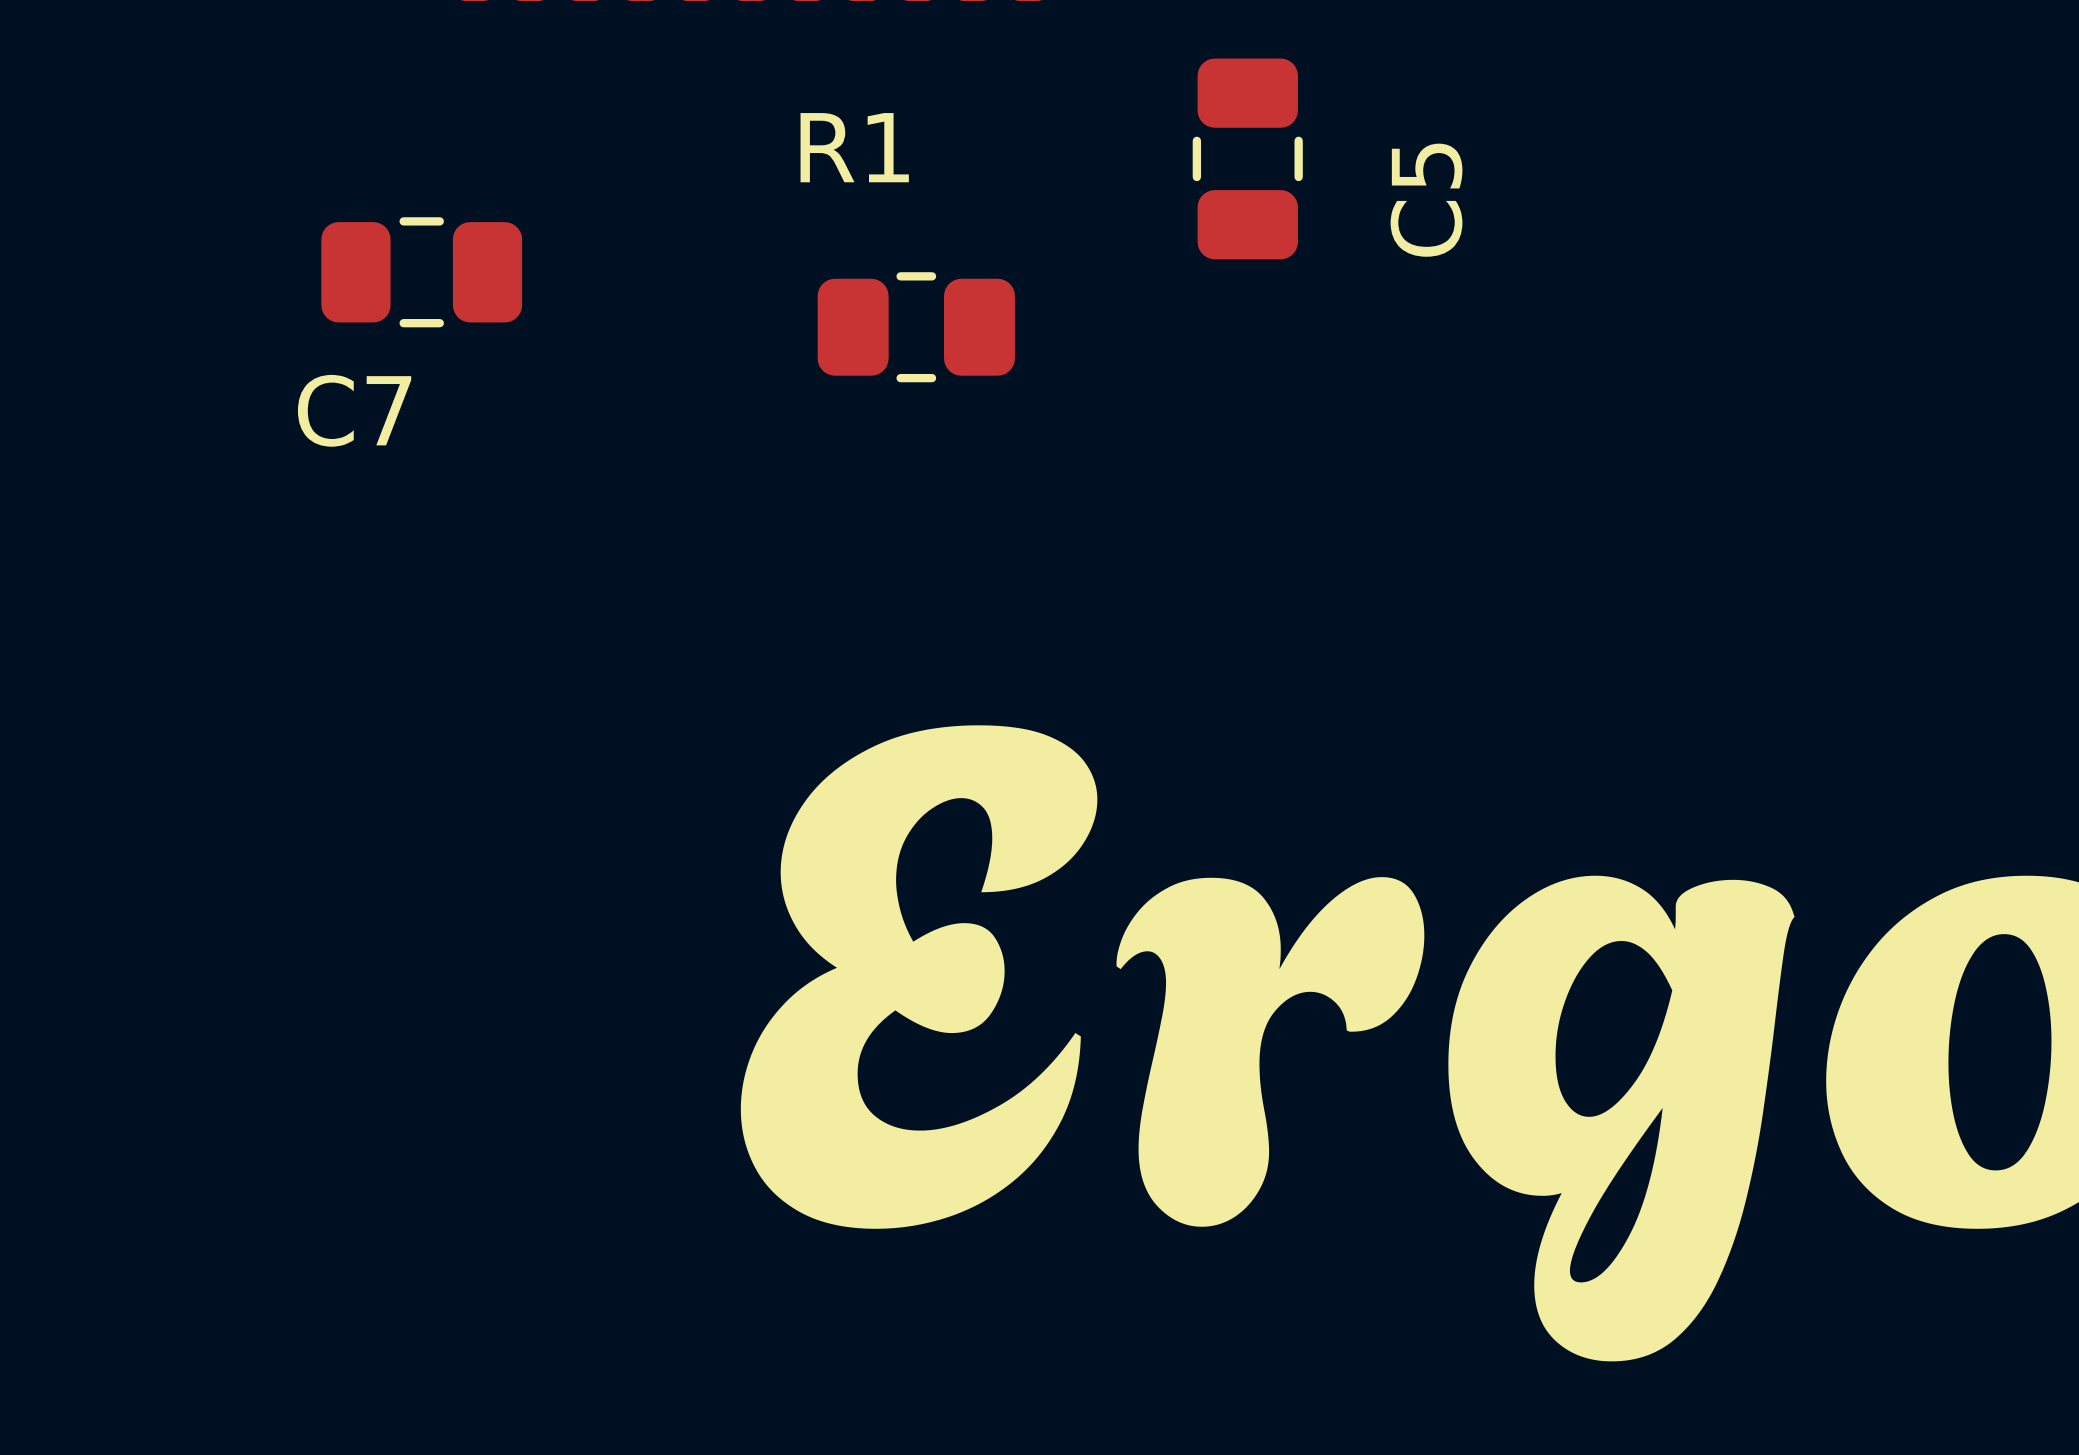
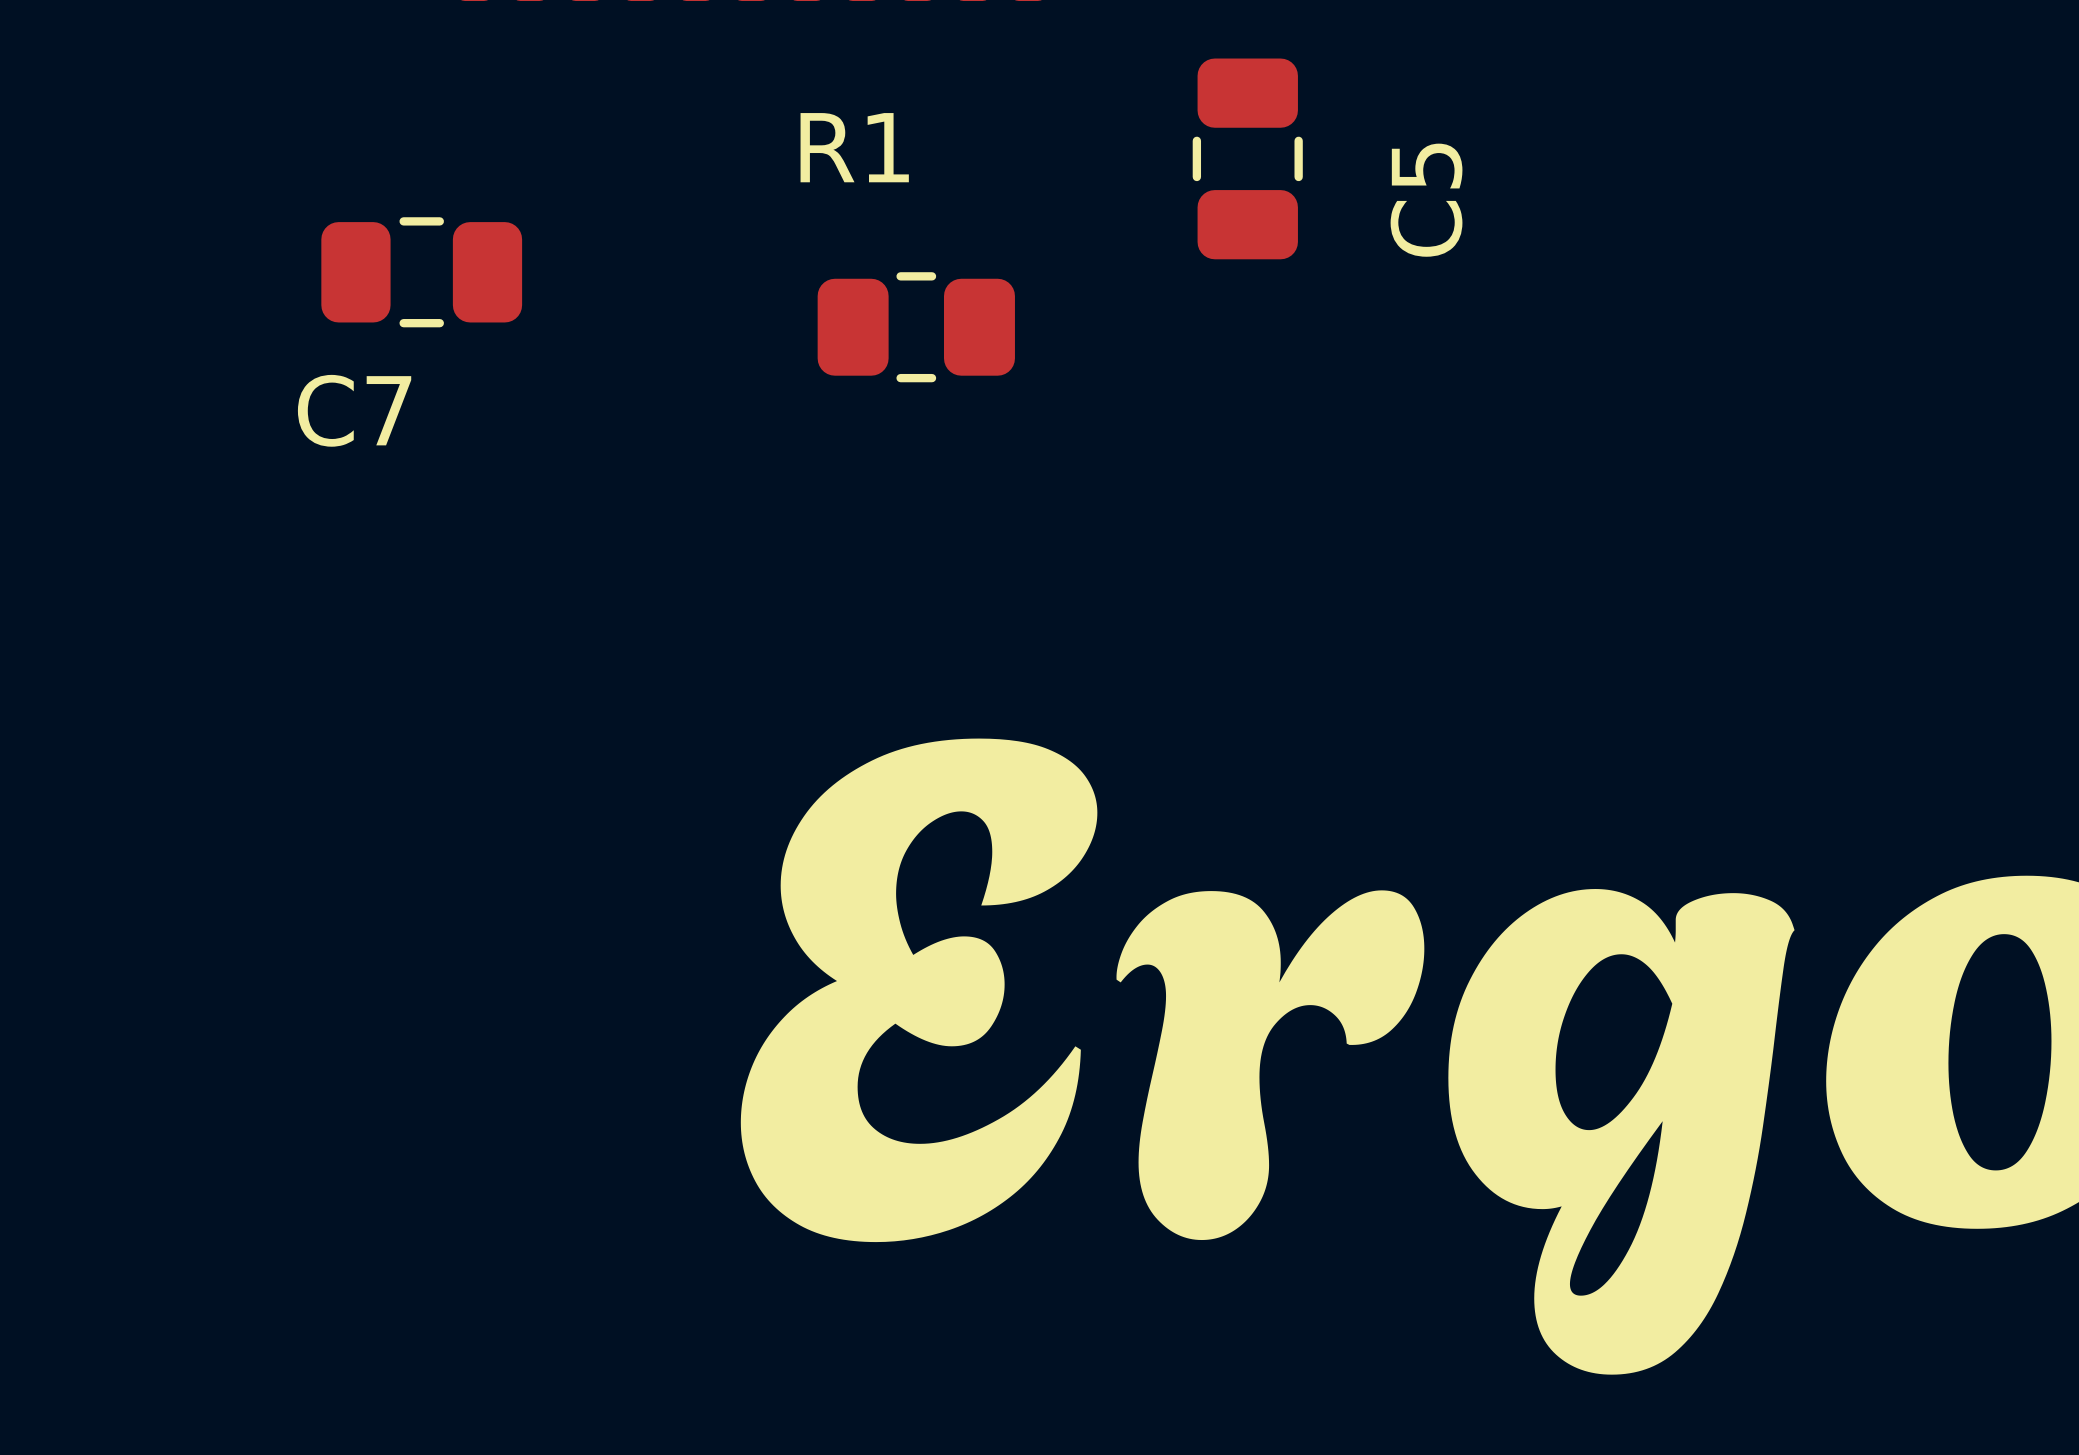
drawing position: (919, 977) -> (919, 990)
drawing position: (1270, 1051) -> (1270, 1065)
drawing position: (1621, 1118) -> (1621, 1131)

